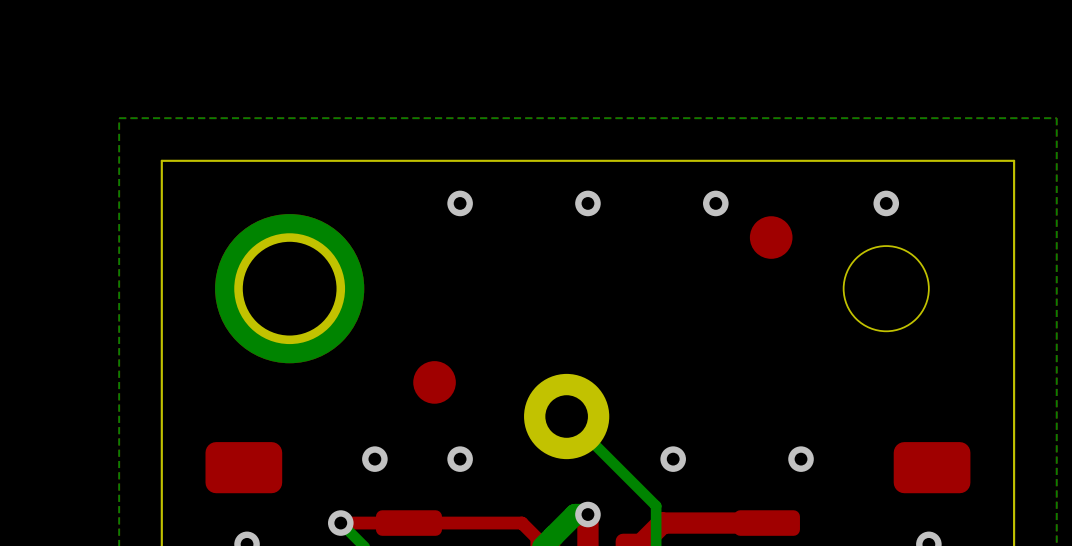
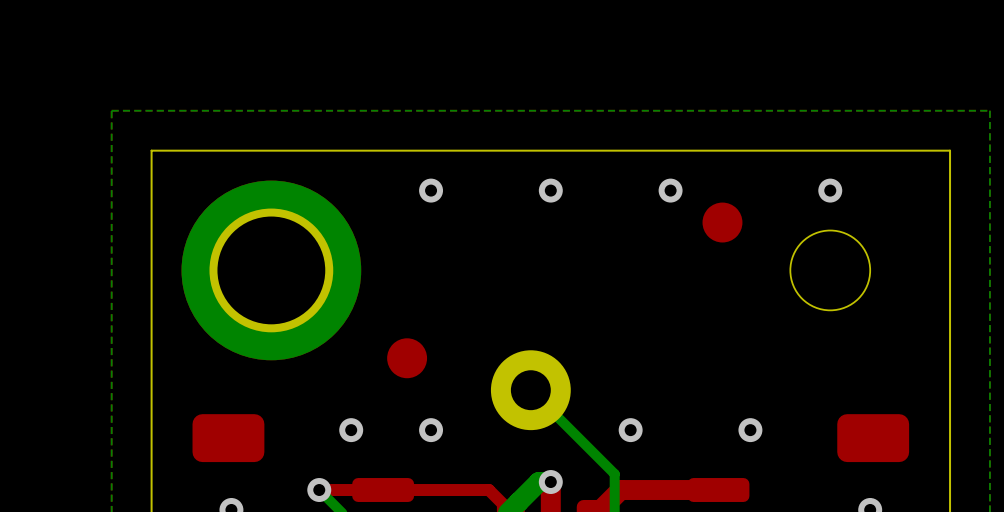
part footprint: [215, 214, 365, 364] -> [181, 180, 362, 361]

